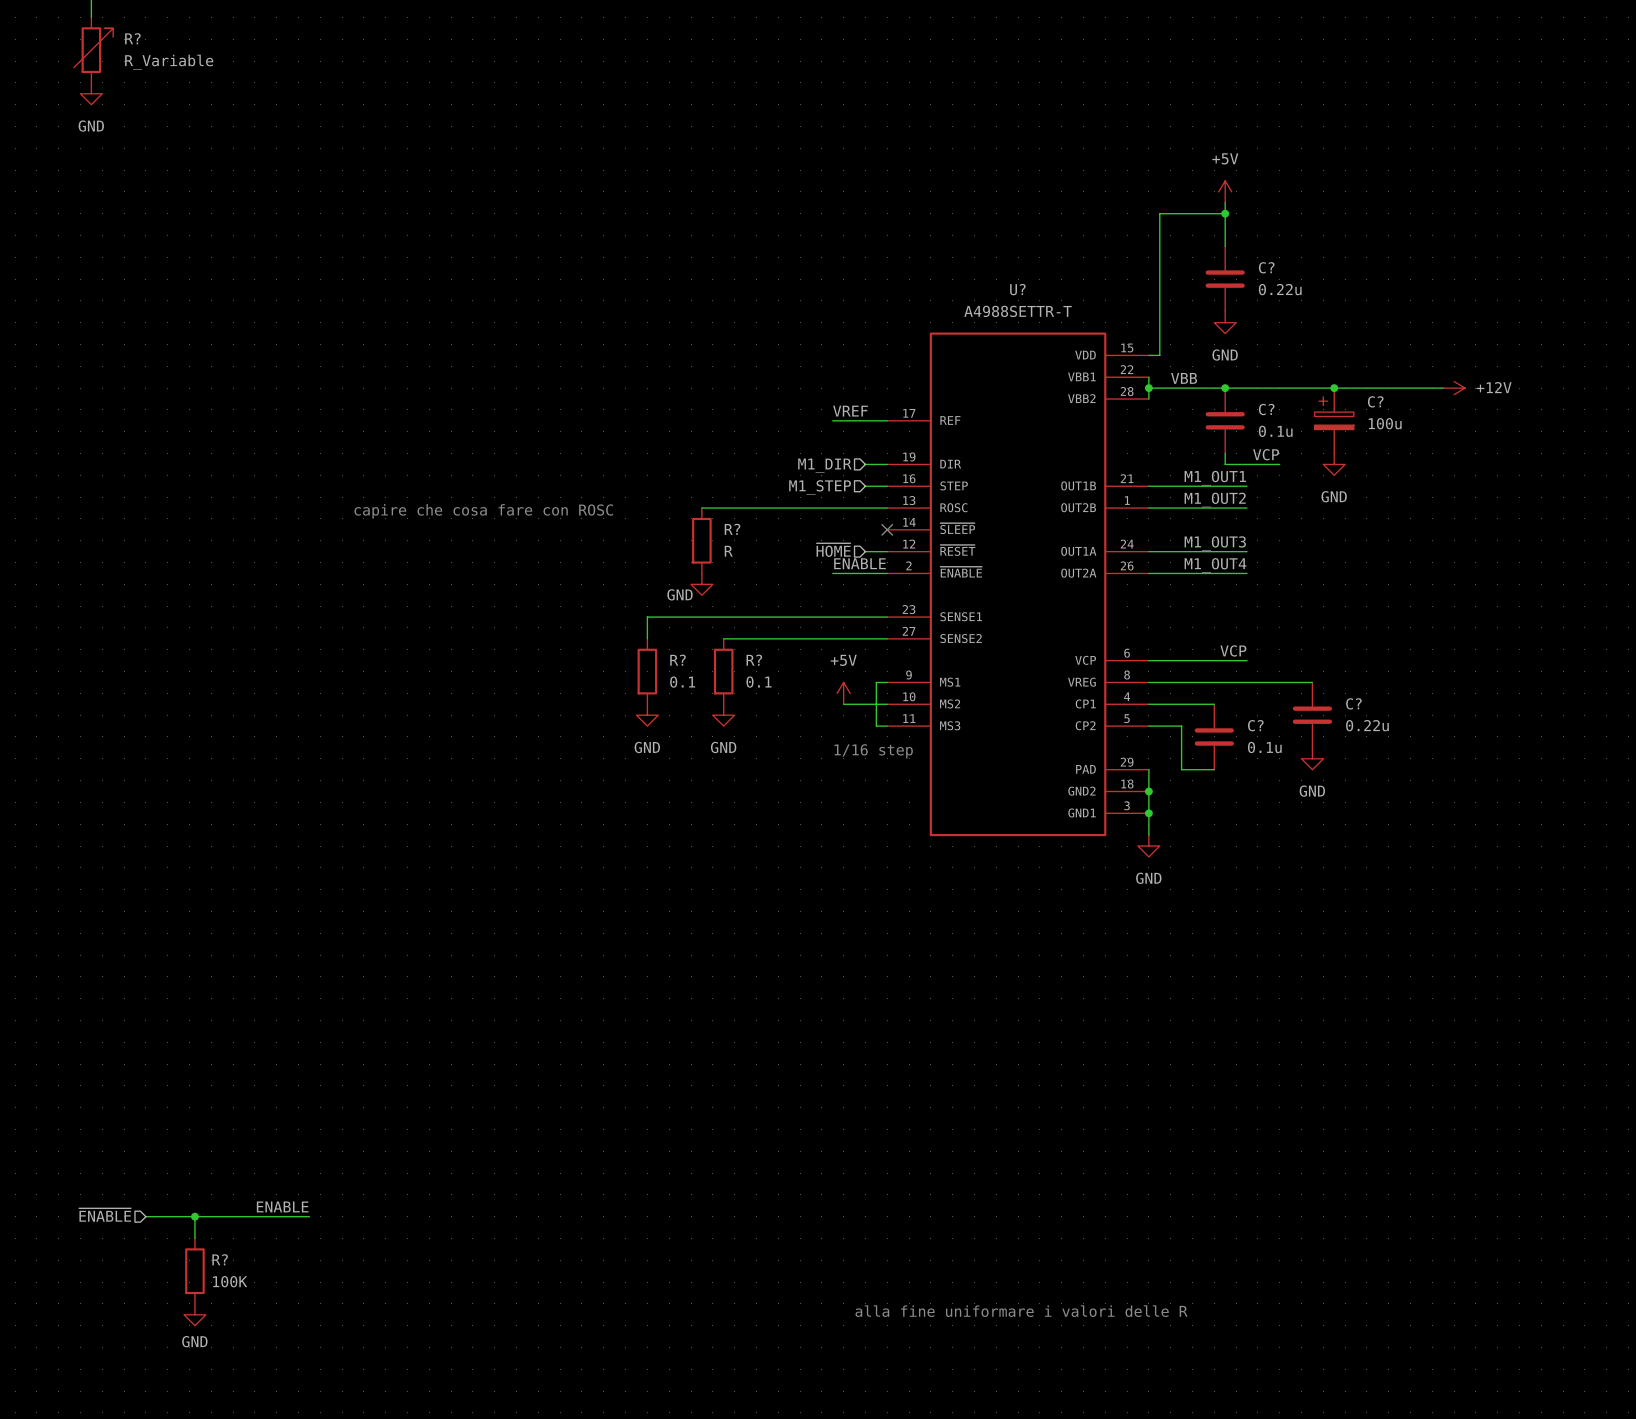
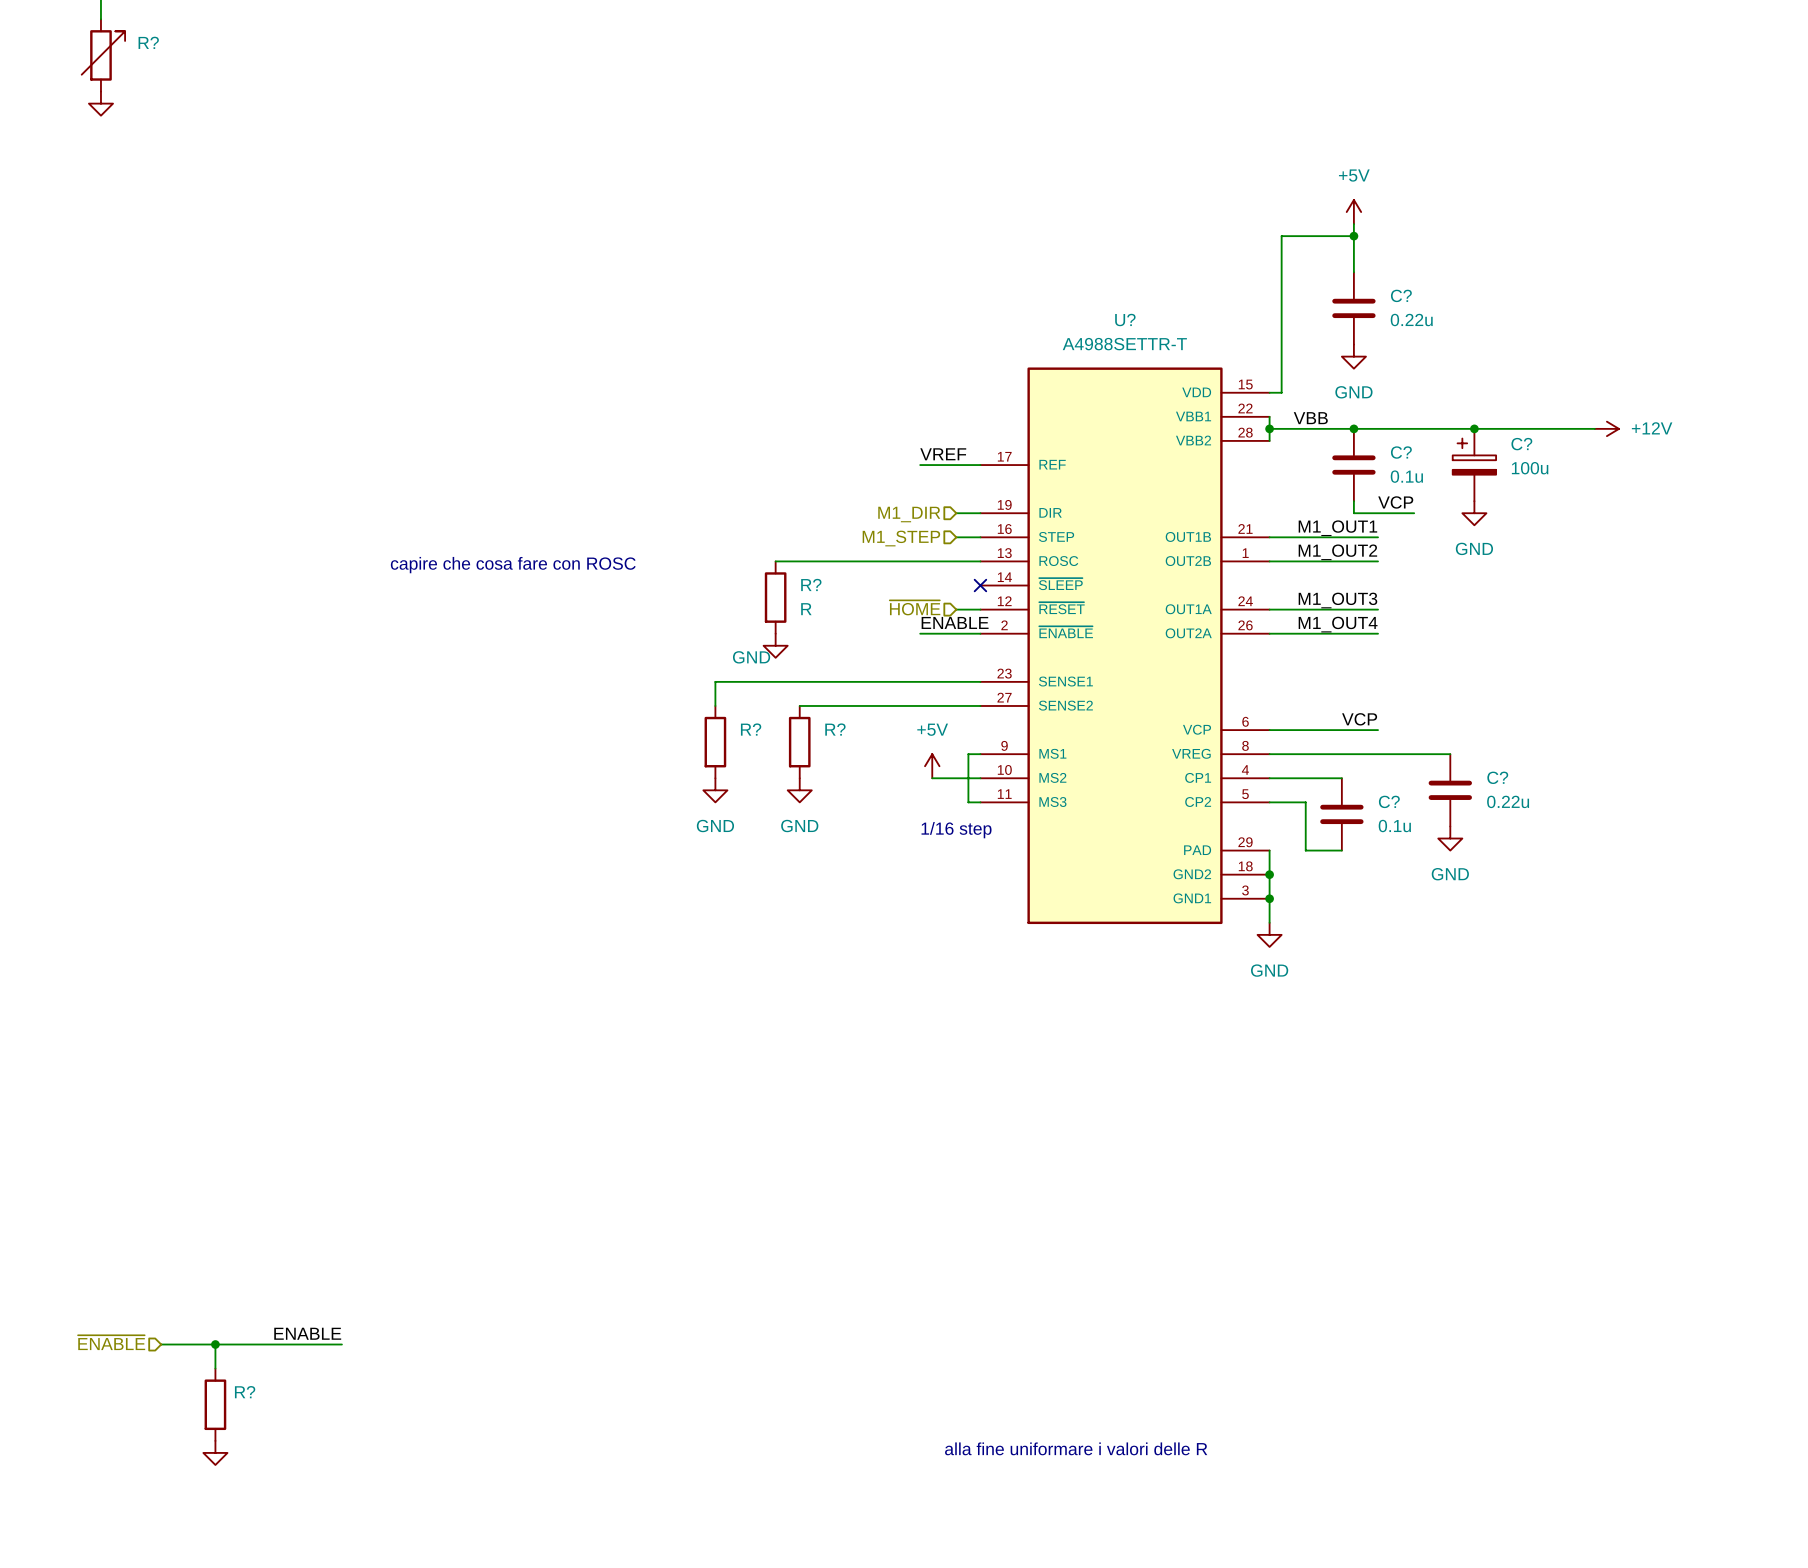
R? value: R_Variable (169, 62) -> none
power symbol text: GND (91, 126) -> none
R? value: 0.1 (682, 682) -> none
R? value: 0.1 (758, 682) -> none
R? value: 100K (230, 1281) -> none
power symbol text: GND (194, 1341) -> none

